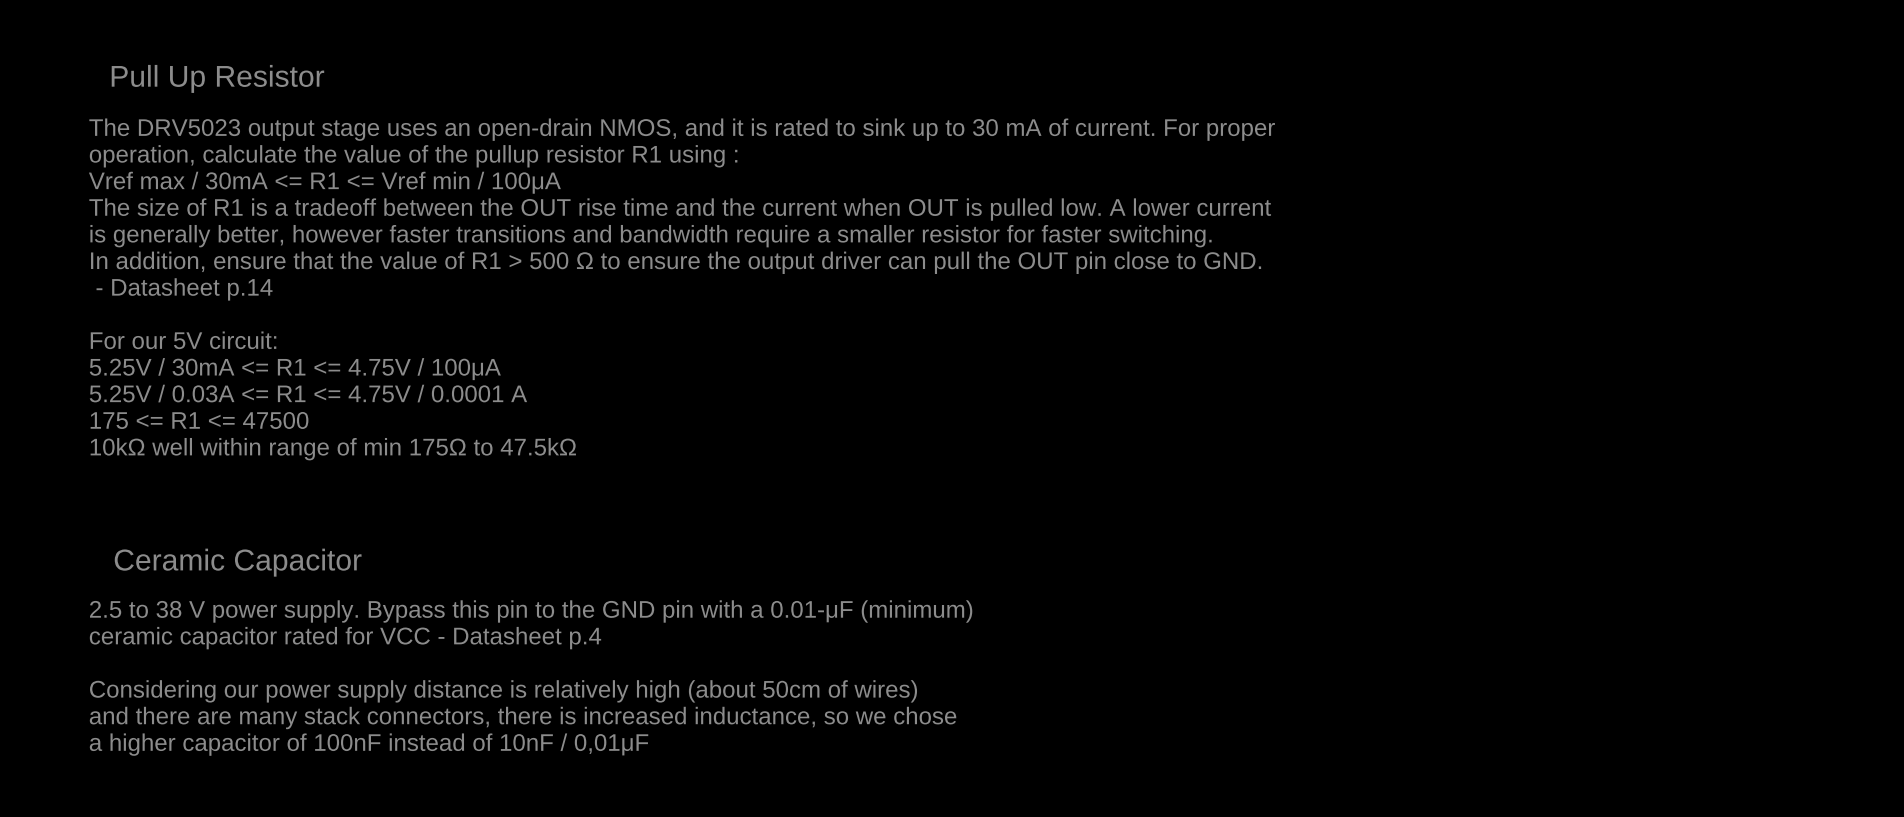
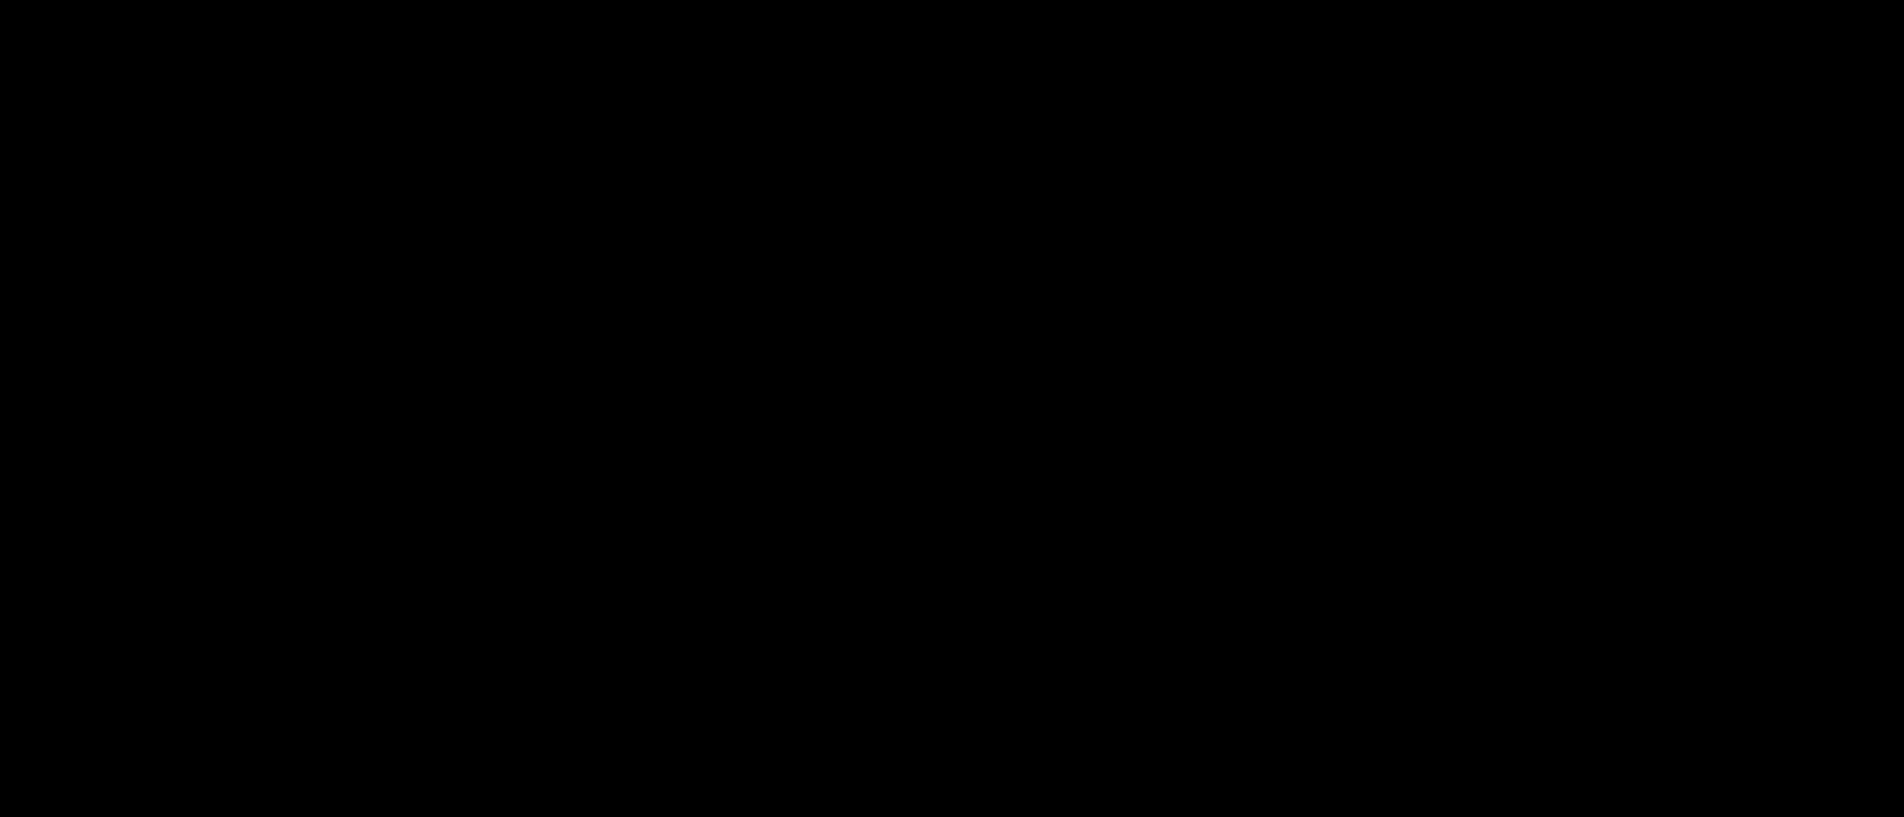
text: Pull Up Resistor (217, 78) -> none
text: The DRV5023 output stage uses an open-drain NMOS, and it is rated to sink up to 30 mA of current. For proper (682, 129) -> none
text: operation, calculate the value of the pullup resistor R1 using : (413, 156) -> none
text: Vref max / 30mA <= R1 <= Vref min / 100μA (324, 182) -> none
text: The size of R1 is a tradeoff between the OUT rise time and the current when OUT is pulled low. A lower current (680, 209) -> none
text: is generally better, however faster transitions and bandwidth require a smaller resistor for faster switching. (651, 236) -> none
text: In addition, ensure that the value of R1 > 500 Ω to ensure the output driver can pull the OUT pin close to GND. (676, 262) -> none
text: - Datasheet p.14 (184, 289) -> none
text: For our 5V circuit: (183, 340) -> none
text: 5.25V / 30mA <= R1 <= 4.75V / 100μA (295, 369) -> none
text: 5.25V / 0.03A <= R1 <= 4.75V / 0.0001 A (308, 393) -> none
text: 175 <= R1 <= 47500 (199, 420) -> none
text: 10kΩ well within range of min 175Ω to 47.5kΩ (333, 449) -> none
text: Ceramic Capacitor (238, 562) -> none
text: 2.5 to 38 V power supply. Bypass this pin to the GND pin with a 0.01-μF (minimum) (531, 611) -> none
text: ceramic capacitor rated for VCC - Datasheet p.4 (345, 638) -> none
text: Considering our power supply distance is relatively high (about 50cm of wires) (503, 691) -> none
text: and there are many stack connectors, there is increased inductance, so we chose (523, 717) -> none
text: a higher capacitor of 100nF instead of 10nF / 0,01μF (369, 744) -> none

